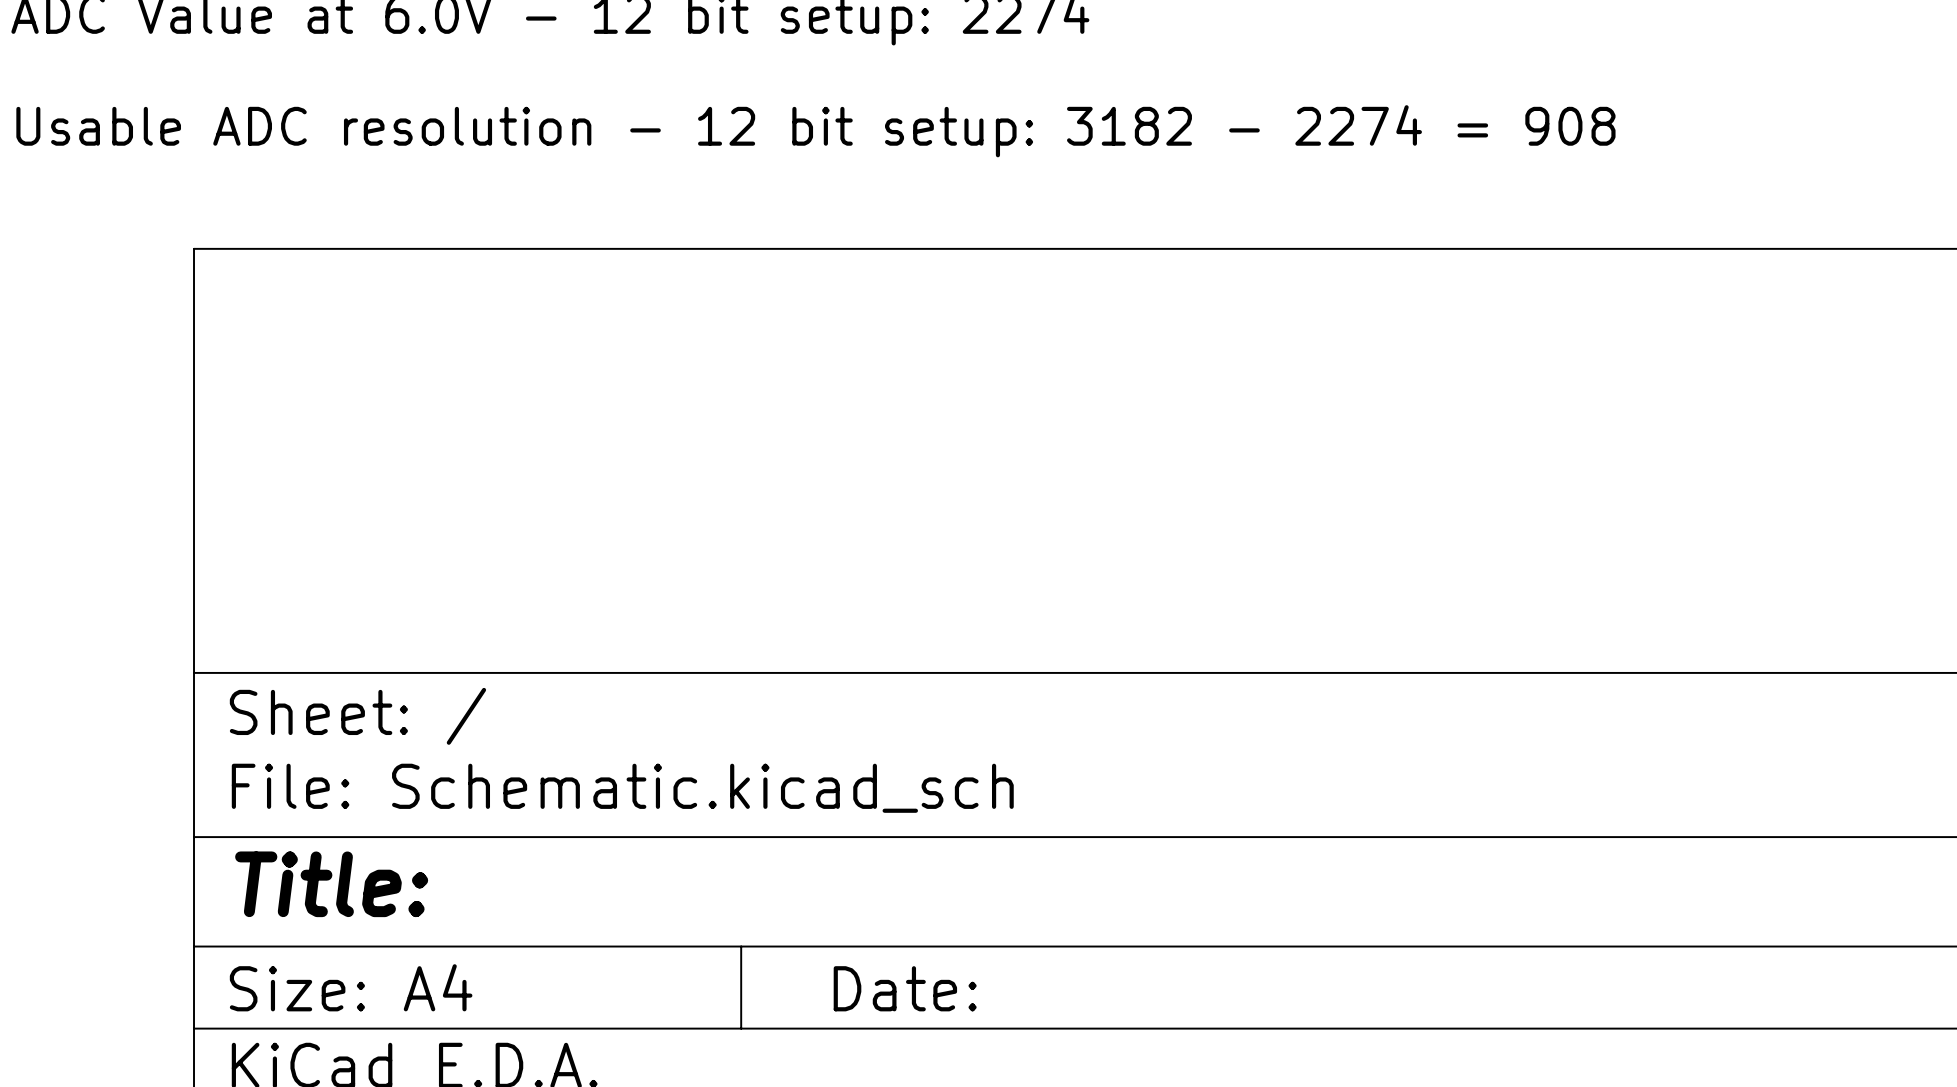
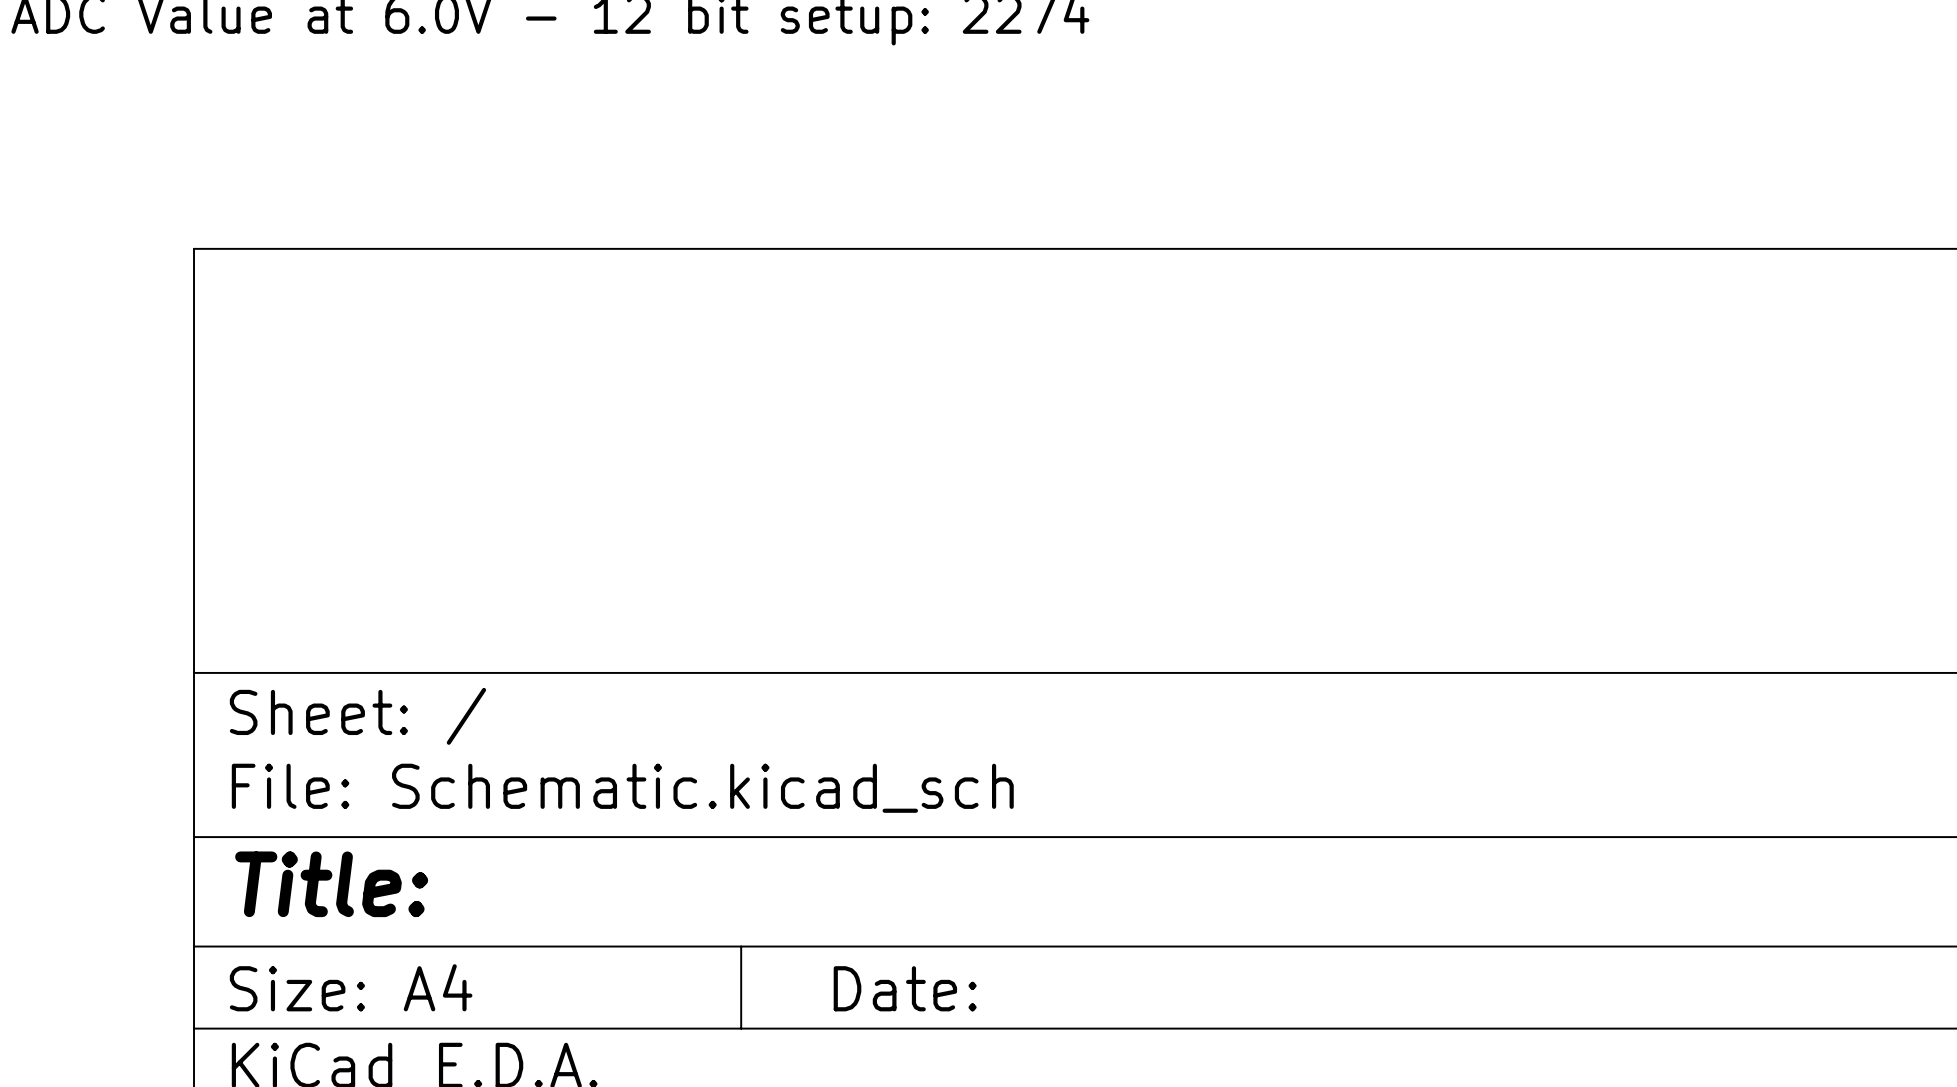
text: Usable ADC resolution - 12 bit setup: 3182 - 2274 = 908 (815, 131) -> none

